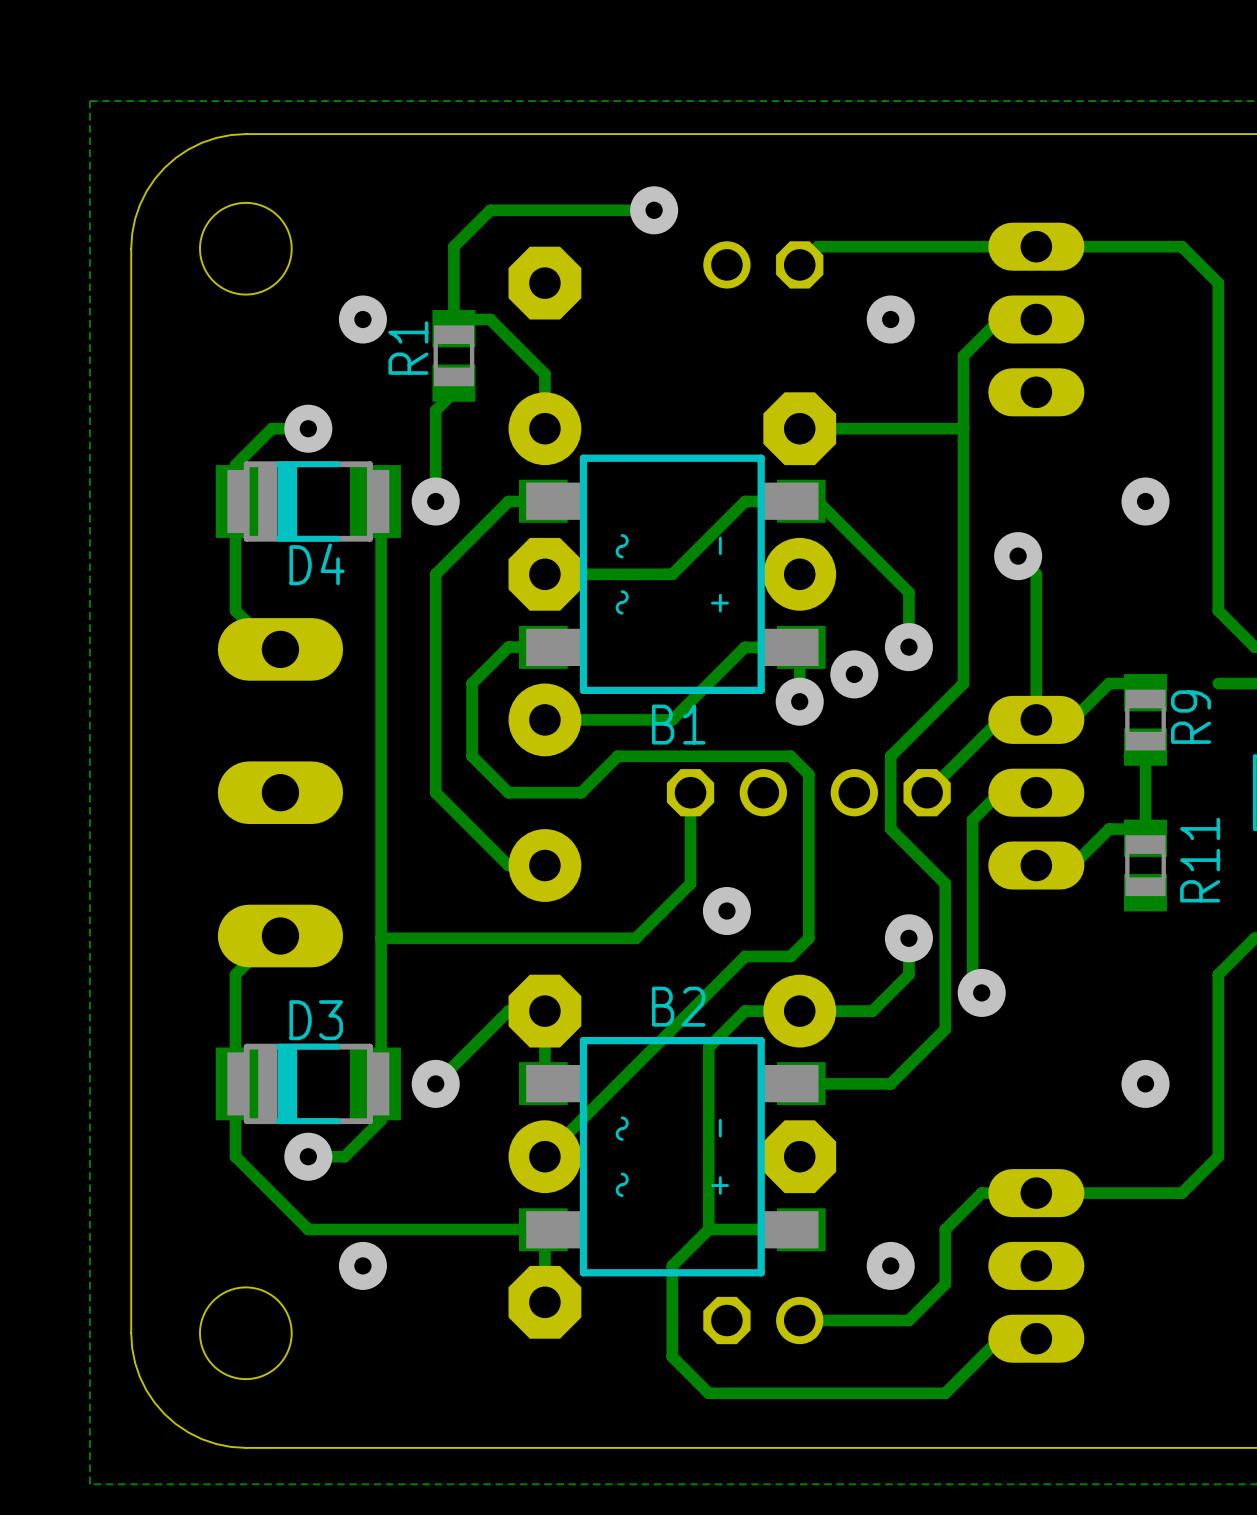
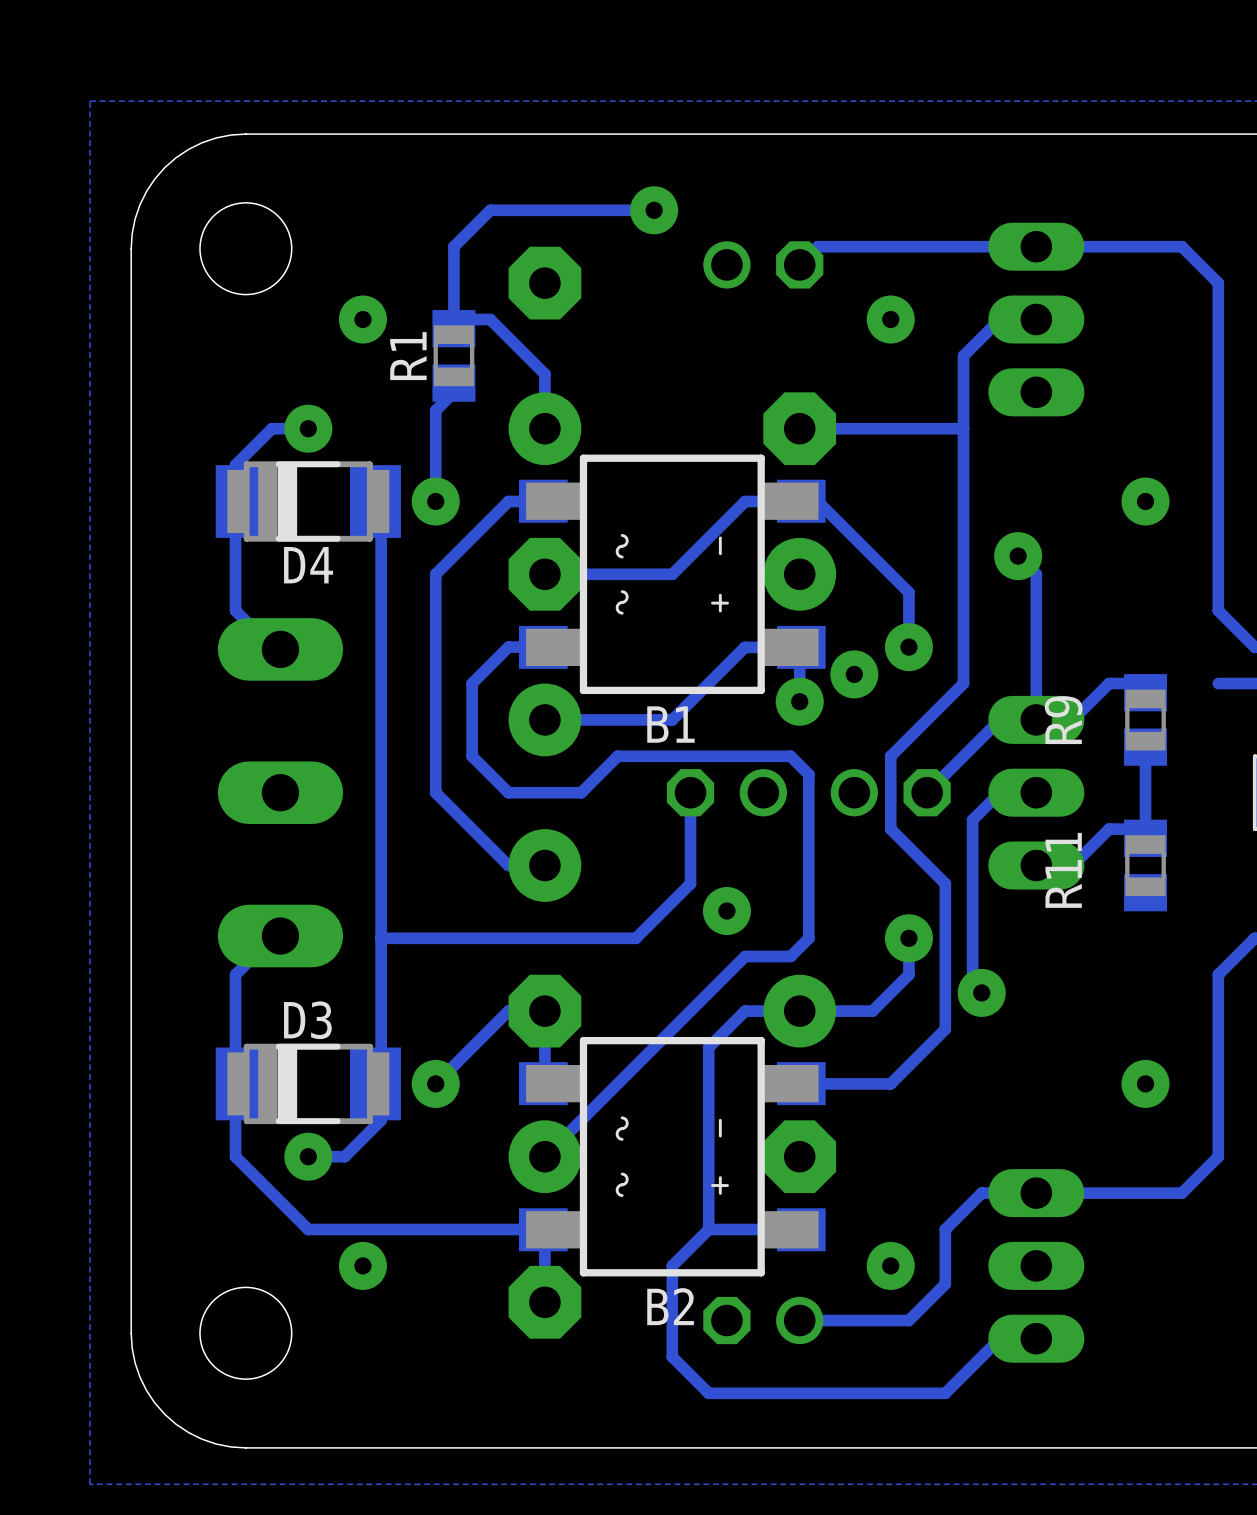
R9 name position: R9 (1191, 717) -> R9 (1063, 720)
R11 name position: R11 (1200, 860) -> R11 (1063, 870)
B2 name position: B2 (678, 1006) -> B2 (670, 1306)

